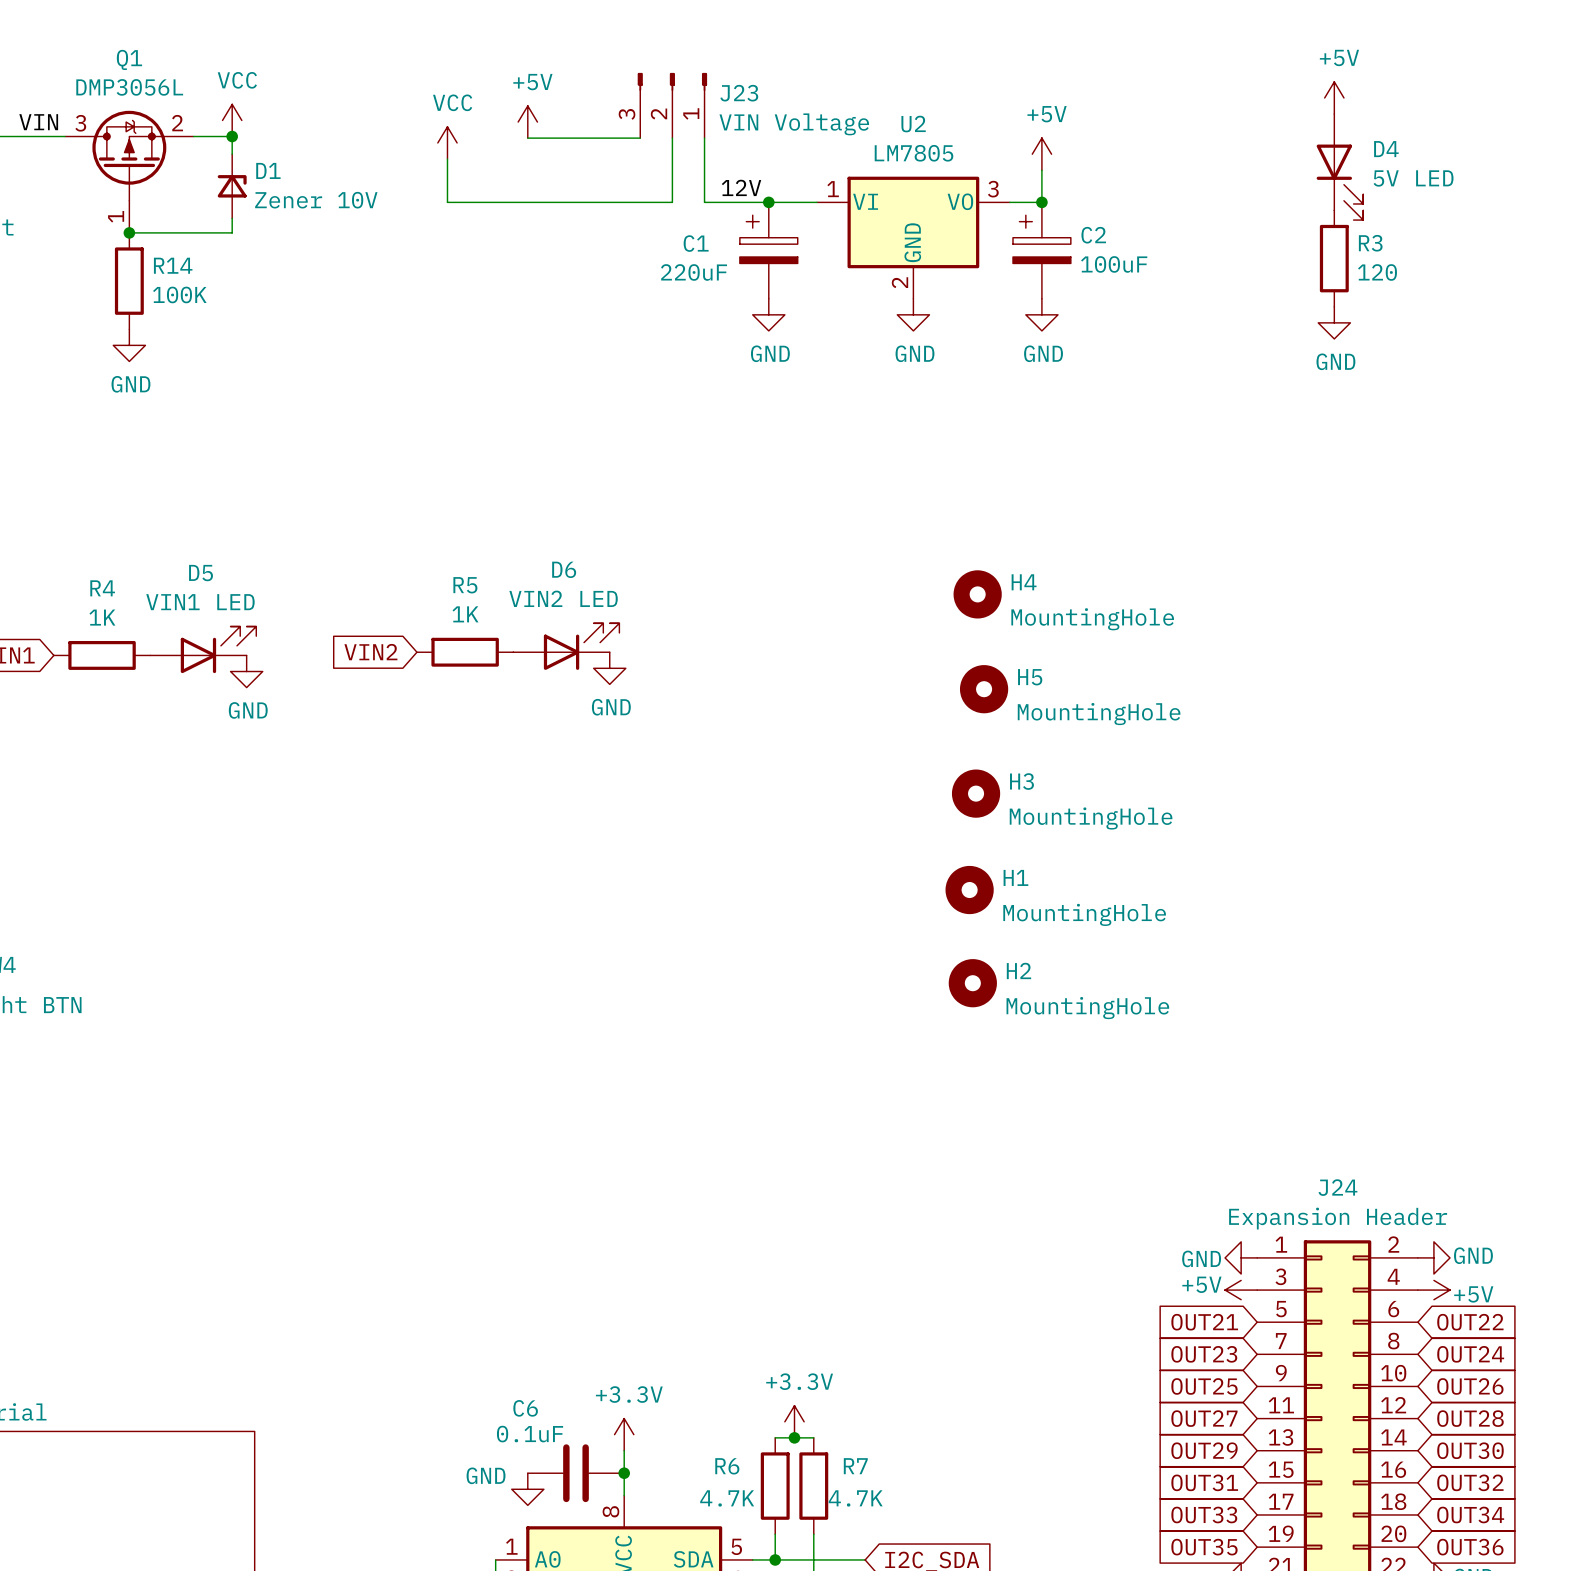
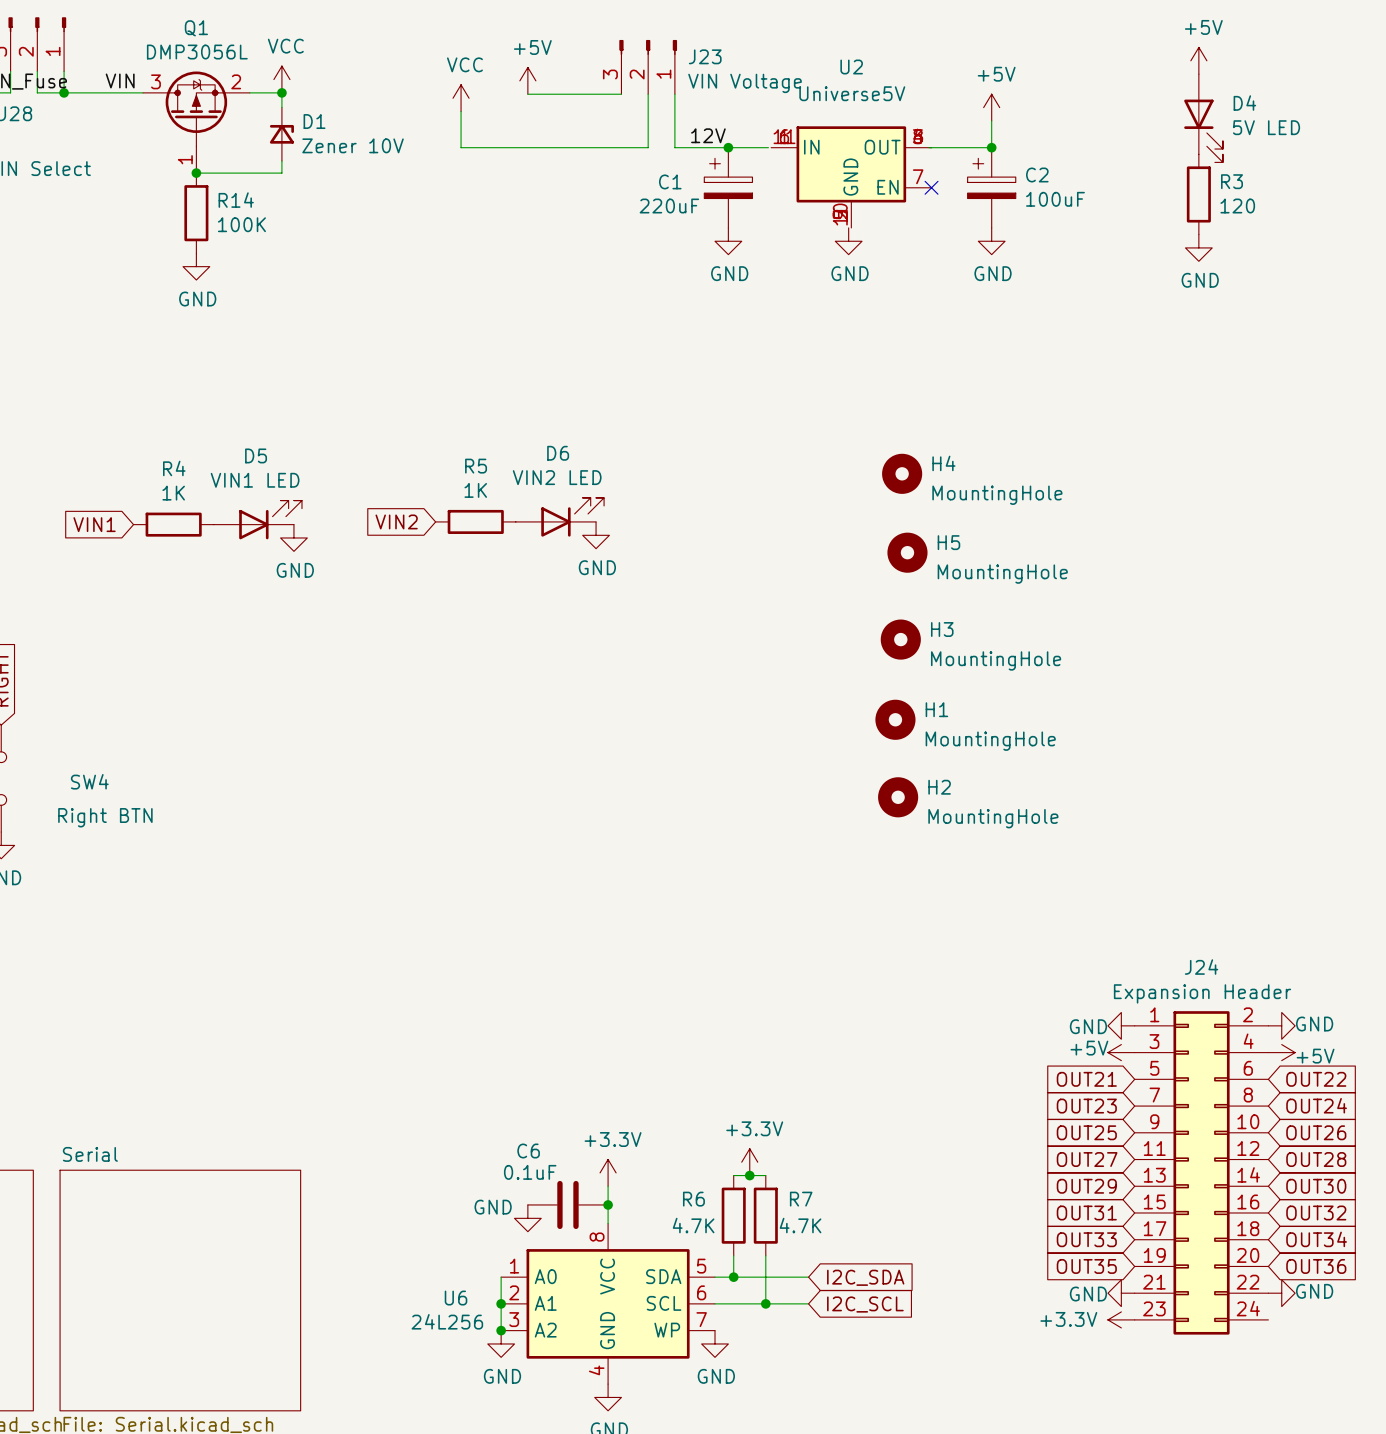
U2 value: LM7805 (914, 153) -> Universe5V (852, 93)
power symbol position: +5V (1041, 154) -> +5V (991, 107)
wire: (1041, 170) (1041, 202) -> (991, 120) (991, 147) (955, 147)
U2 symbol: [816, 176, 1010, 299] -> [771, 126, 932, 228]
junction position: (1041, 202) -> (991, 147)
no-connect mark: none -> (931, 187)
C2 position: (1041, 250) -> (991, 187)
power symbol position: GND (1041, 314) -> GND (991, 241)

